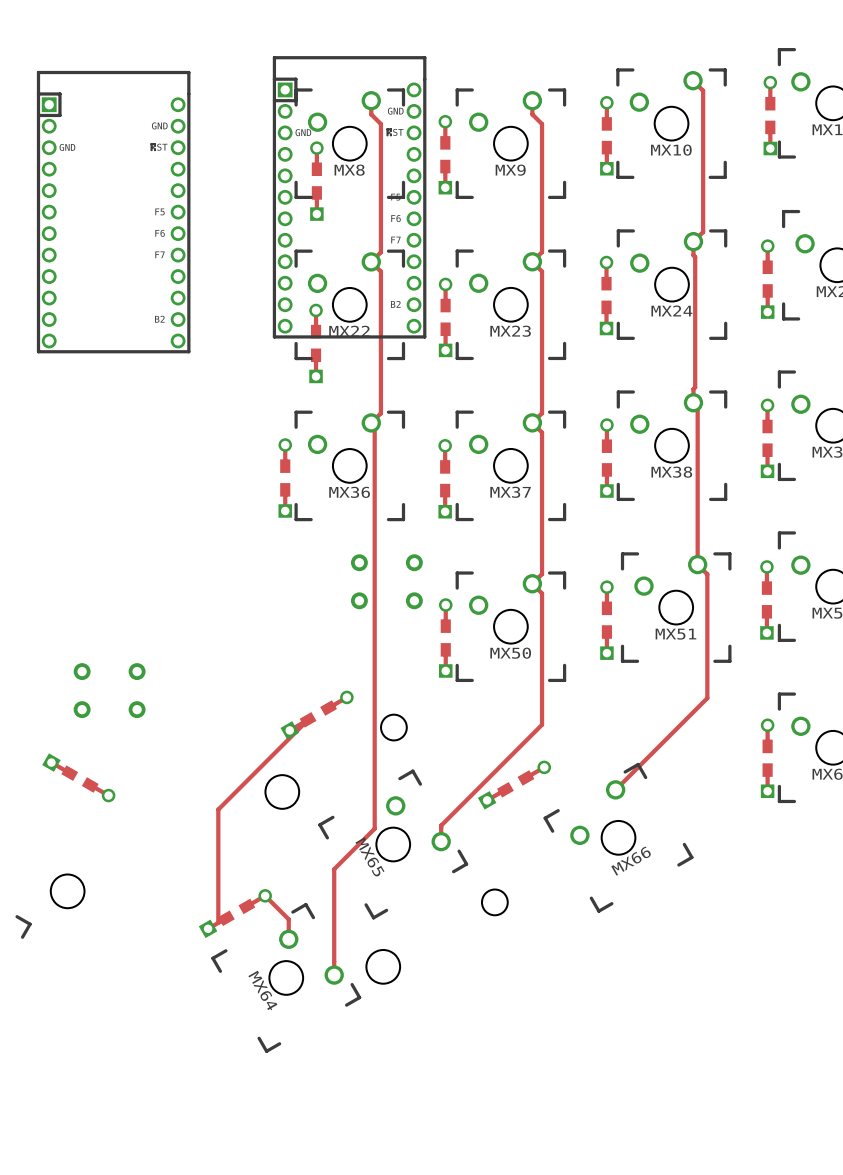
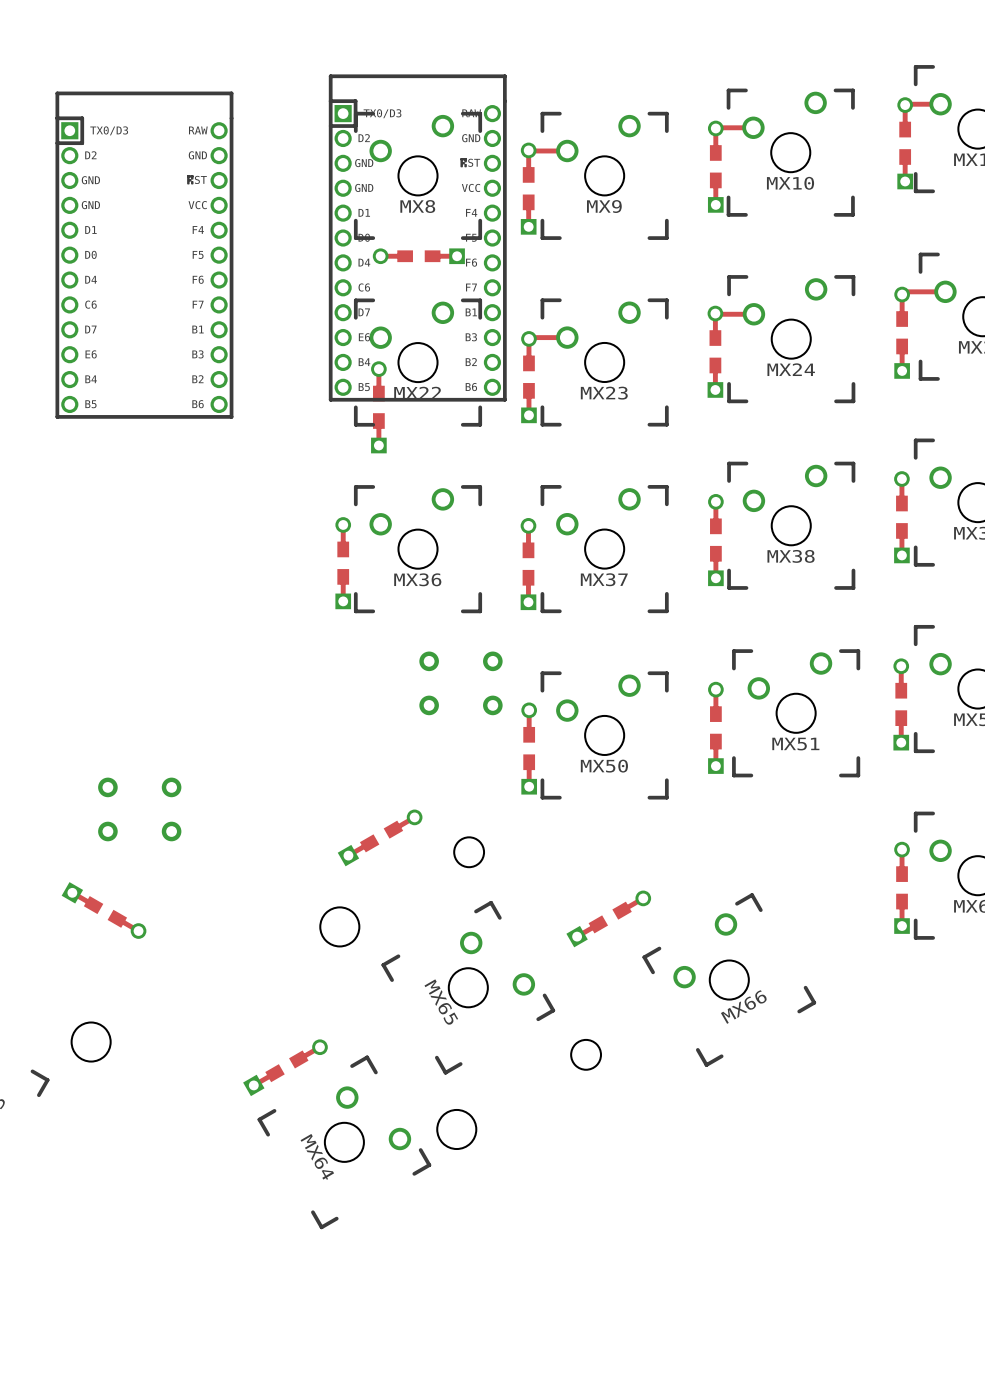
part footprint: [272, 56, 427, 339] -> [328, 74, 507, 402]
part footprint: [36, 70, 191, 354] -> [55, 91, 234, 419]
track: (693, 80) (703, 90) (703, 232) (693, 241) (693, 255) (695, 257) (695, 387) (693, 389) (693, 402) (697, 406) (697, 564) (707, 574) (707, 698) (615, 789) -> none
track: none -> (905, 104) (940, 104)
track: (371, 100) (371, 114) (380, 124) (380, 252) (371, 261) (380, 271) (380, 413) (371, 422) (374, 426) (374, 828) (334, 869) (334, 975) -> none
track: (532, 100) (532, 114) (542, 124) (542, 252) (532, 261) (542, 271) (542, 413) (532, 422) (542, 432) (542, 574) (532, 583) (542, 593) (542, 724) (441, 825) (441, 841) -> none
track: none -> (716, 127) (753, 127)
track: none -> (529, 150) (567, 150)
part rotation: 0° (316, 181) -> 90° counterclockwise (418, 256)
track: none -> (902, 291) (945, 291)
track: none -> (716, 314) (753, 314)
track: none -> (528, 337) (567, 337)
track: (308, 719) (218, 809) (218, 922) -> none
track: (265, 895) (288, 919) (288, 939) -> none

